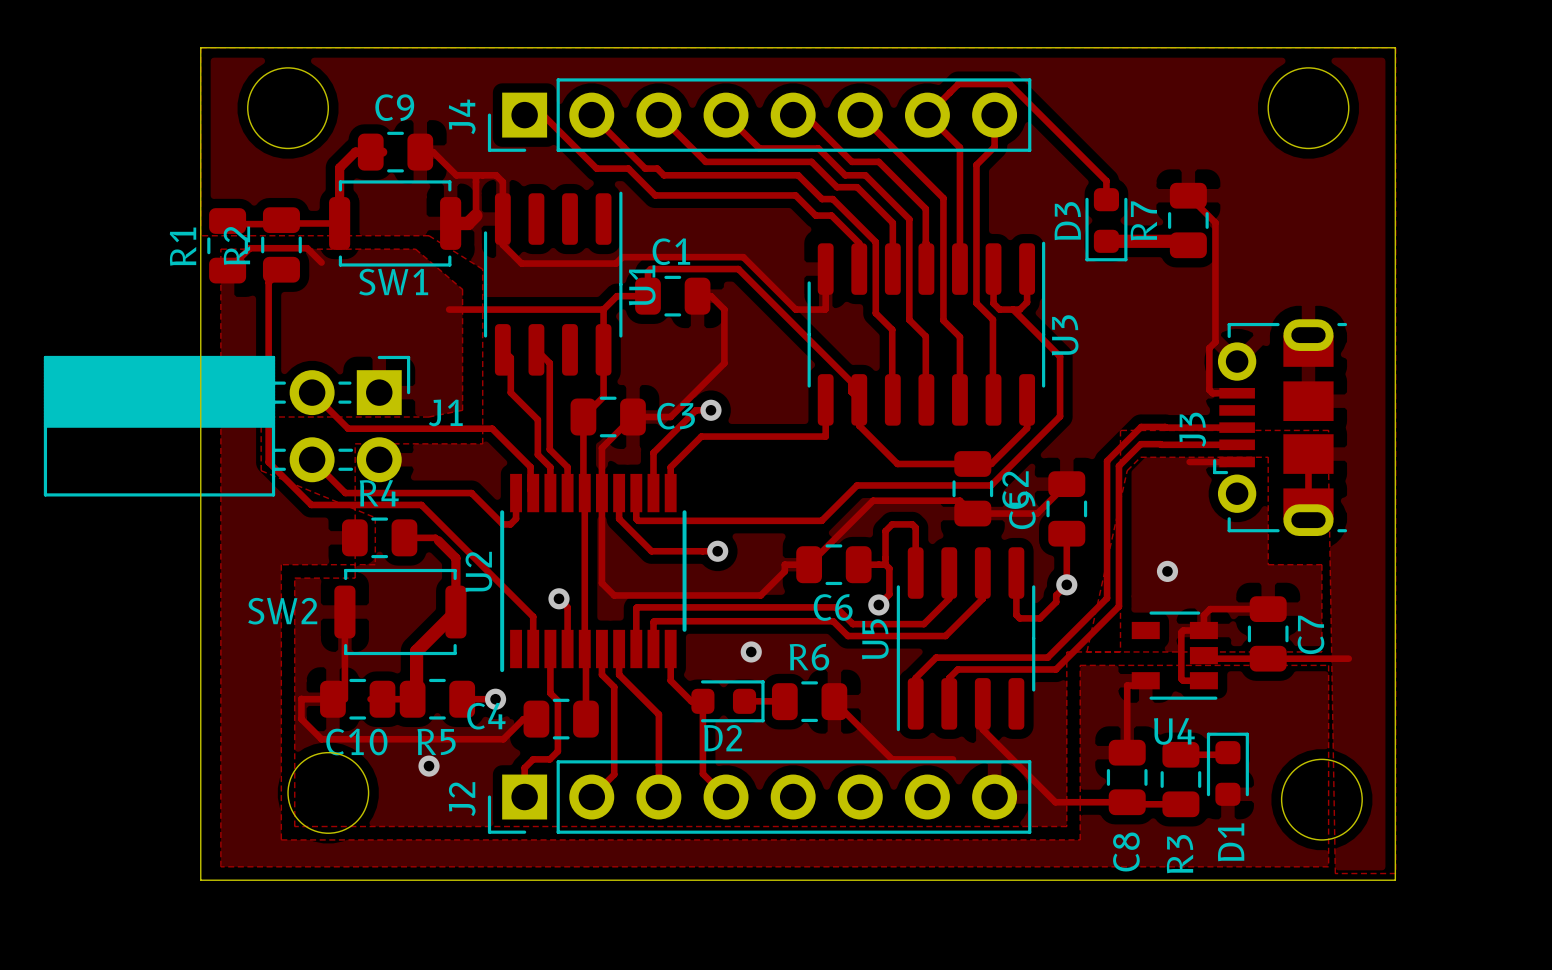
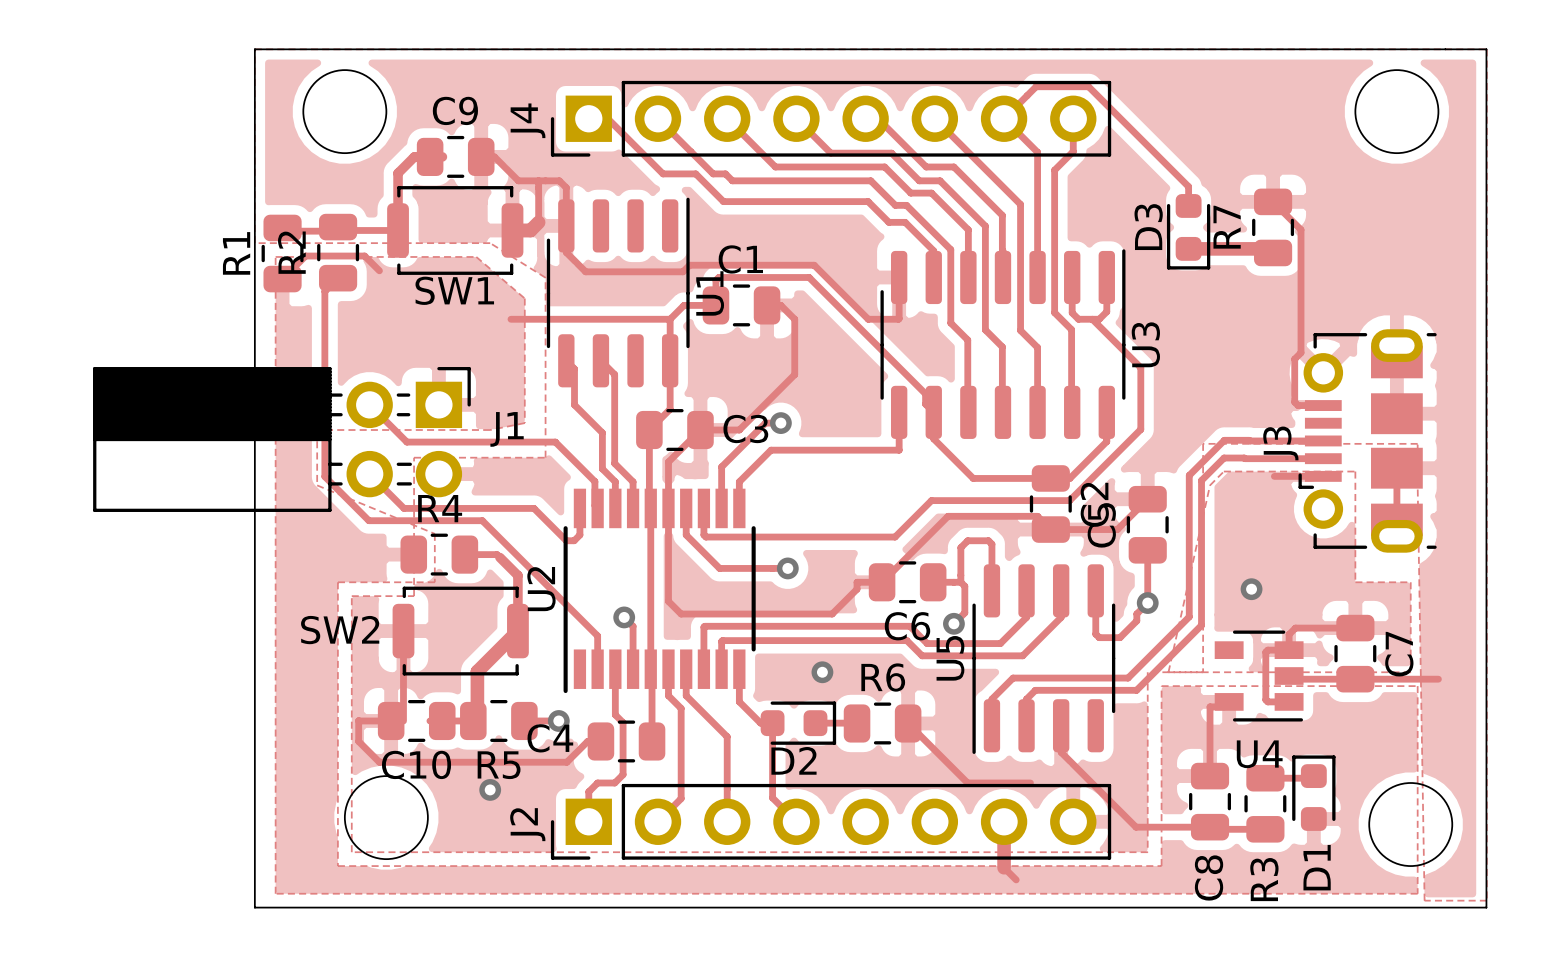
track: none -> (1004, 821) (1004, 867) (1016, 879)

